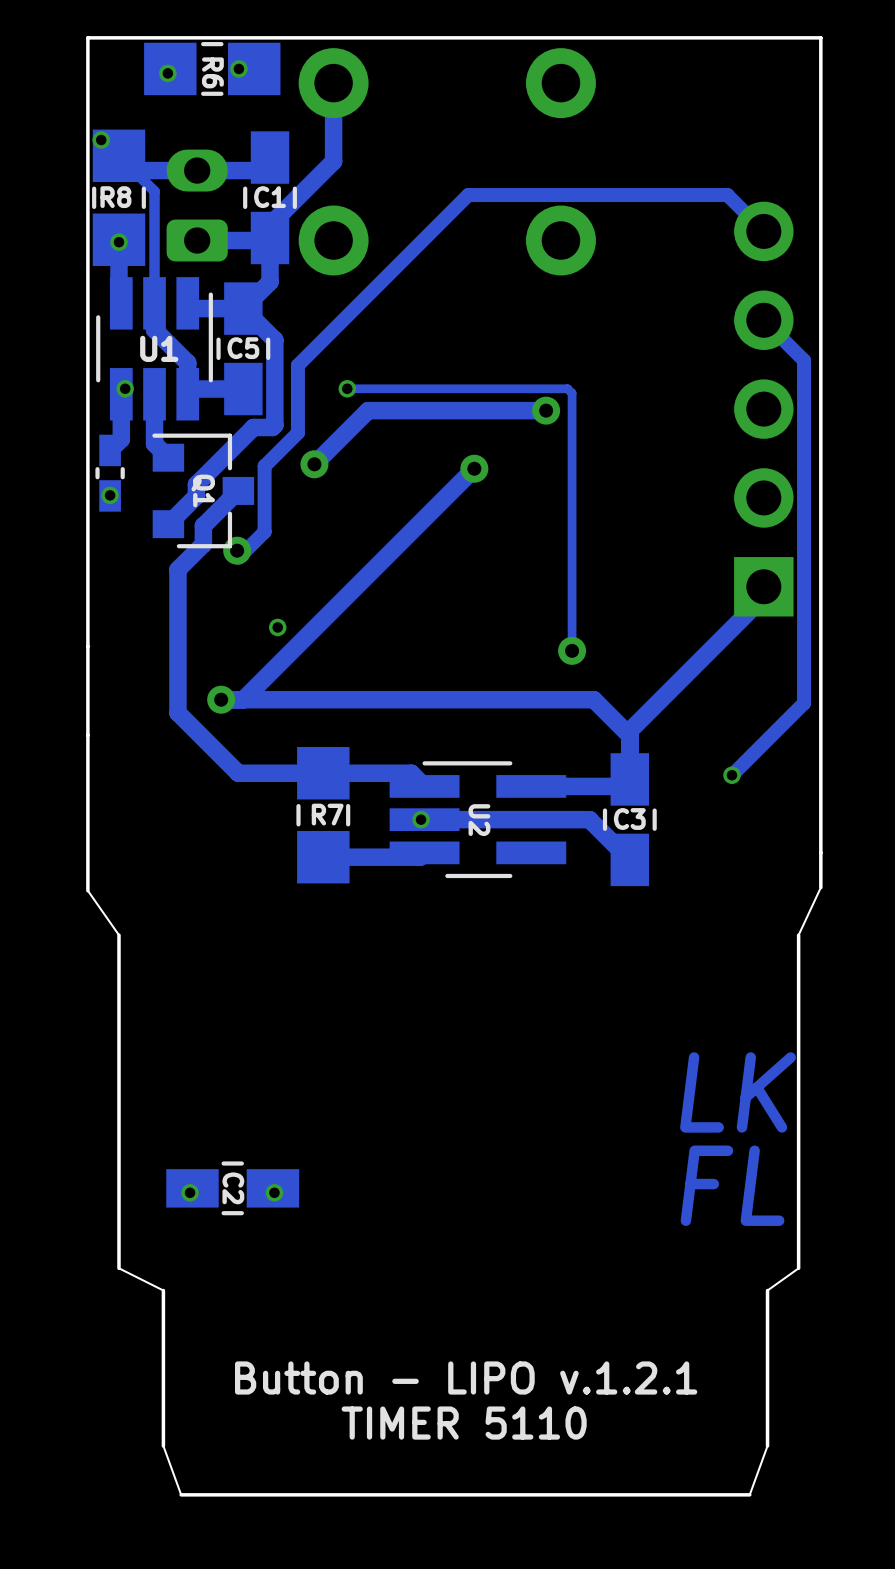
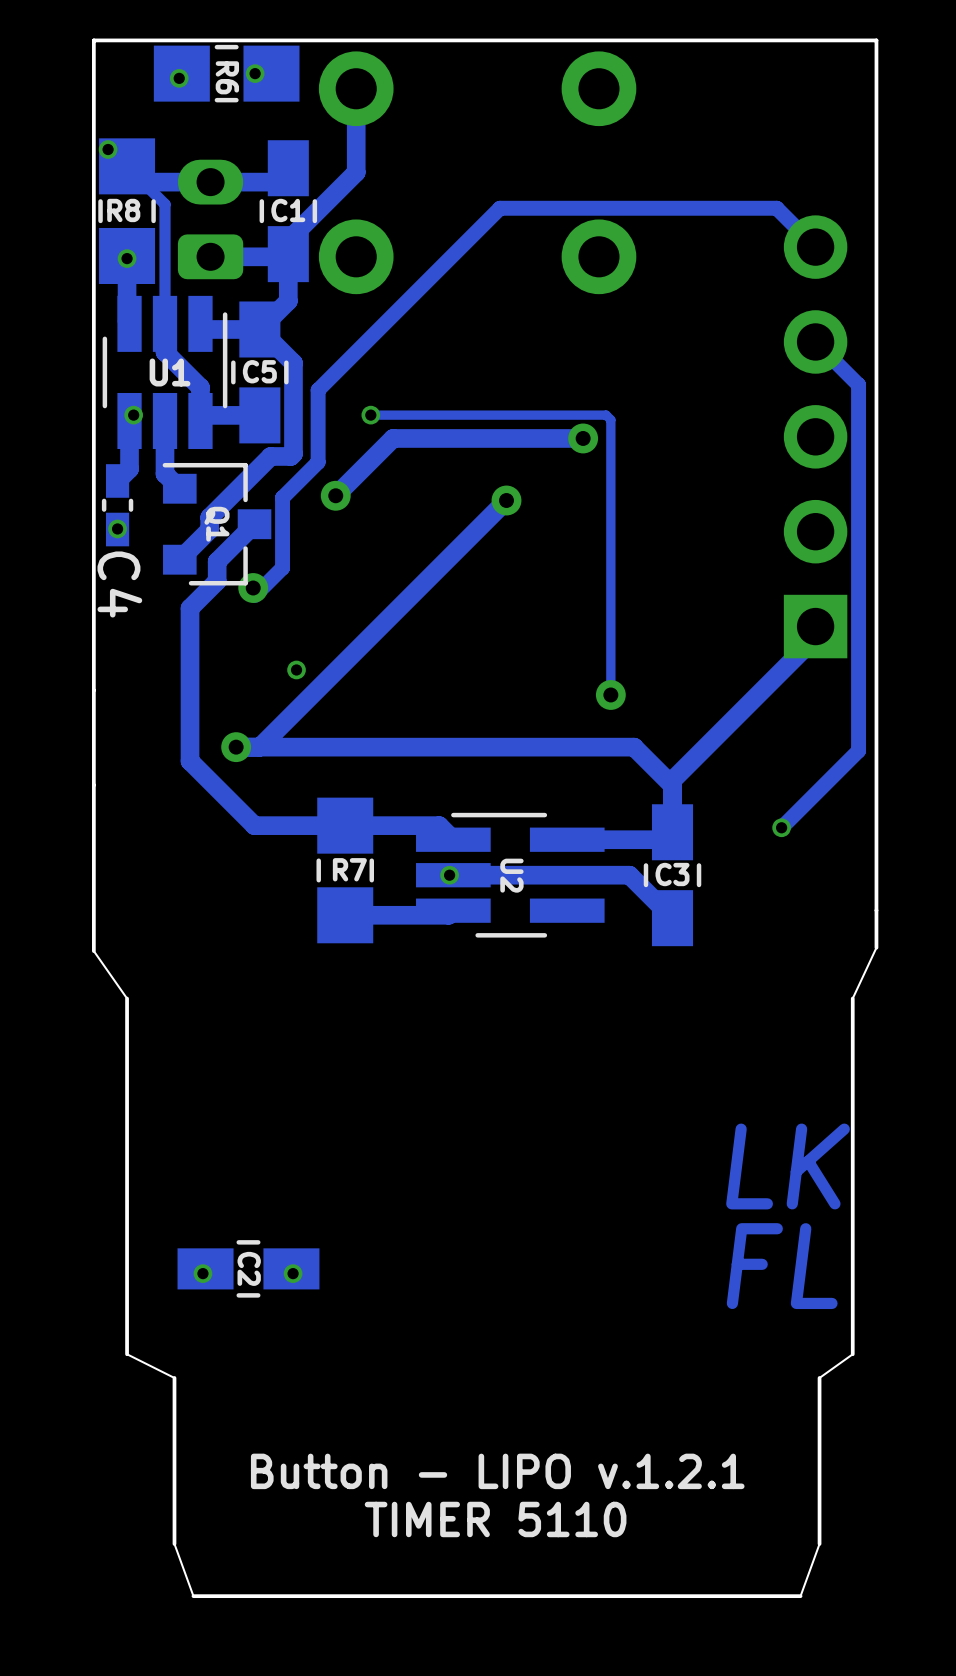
C4 name: none -> C4 (119, 584)

